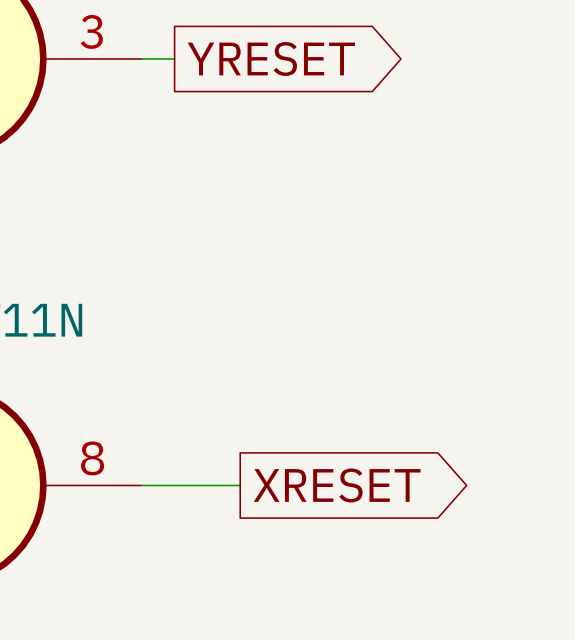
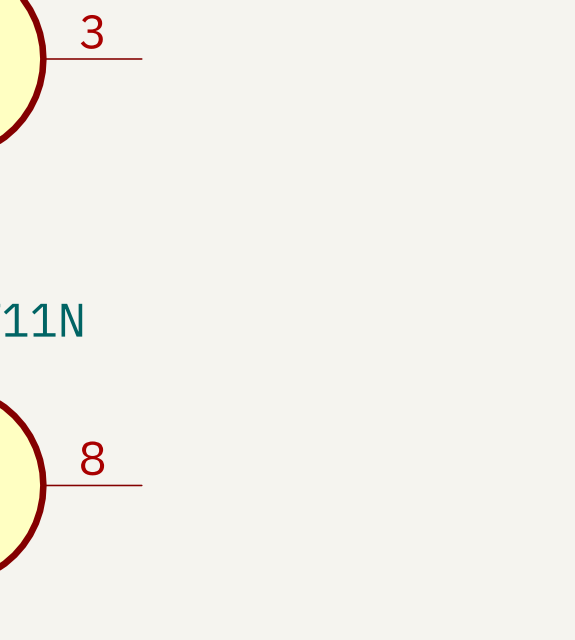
wire: (141, 58) (174, 58) -> none
global label: YRESET (271, 58) -> none
wire: (141, 485) (240, 485) -> none
global label: XRESET (337, 485) -> none

